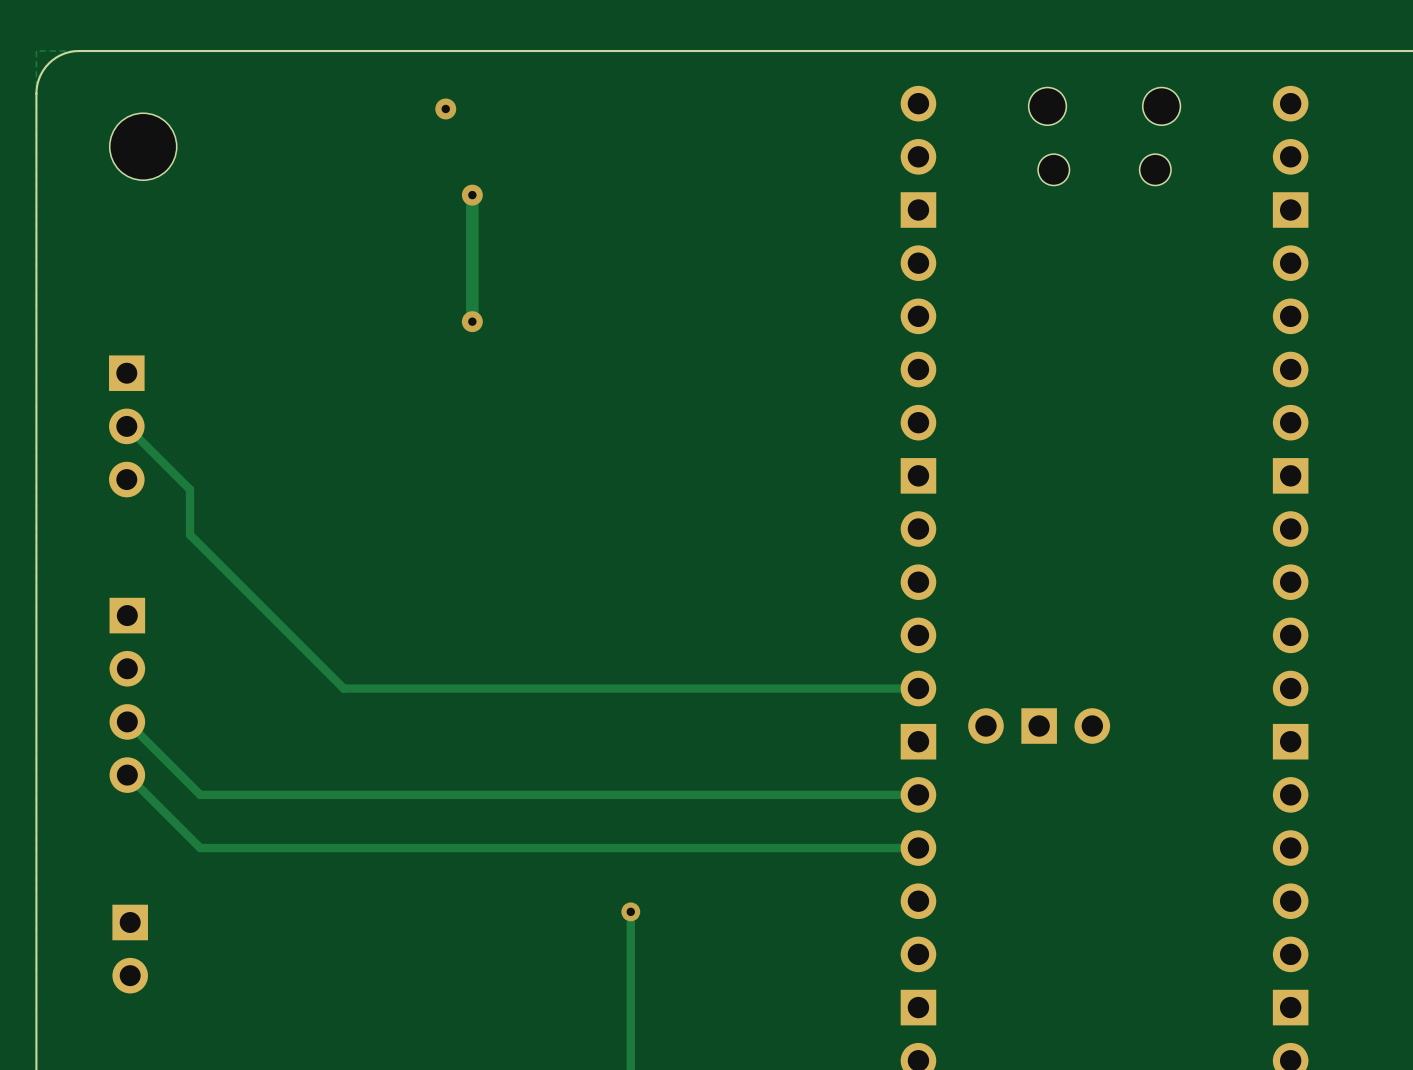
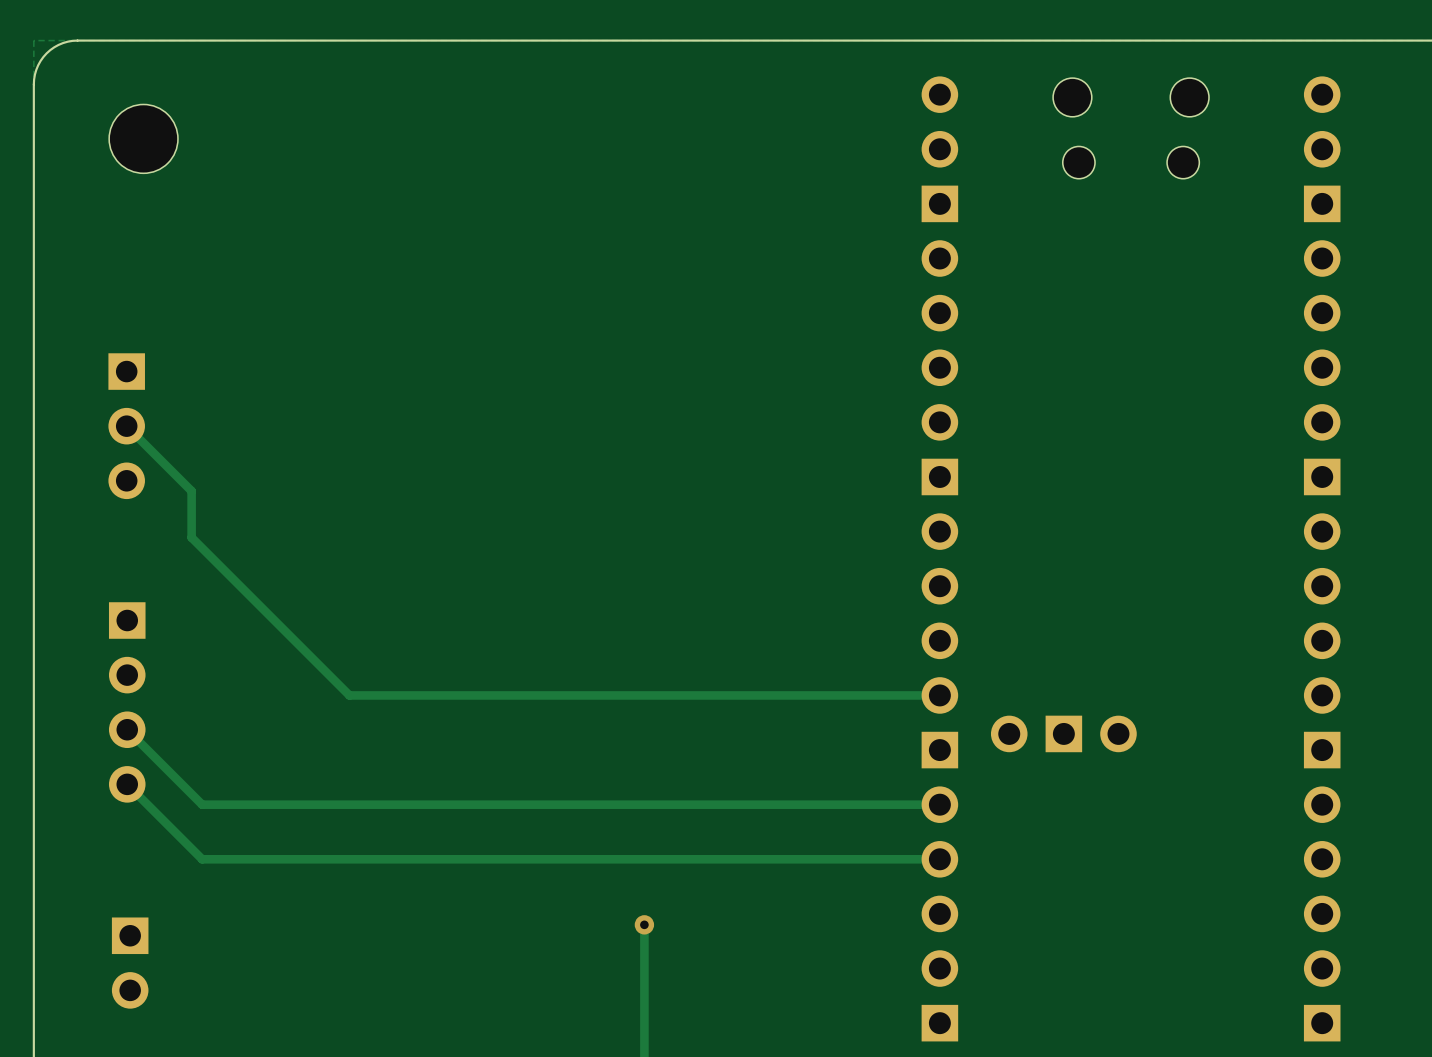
via: (445, 108) -> none
track: (472, 195) (472, 321) -> none
via: (472, 195) -> none
via: (472, 321) -> none

